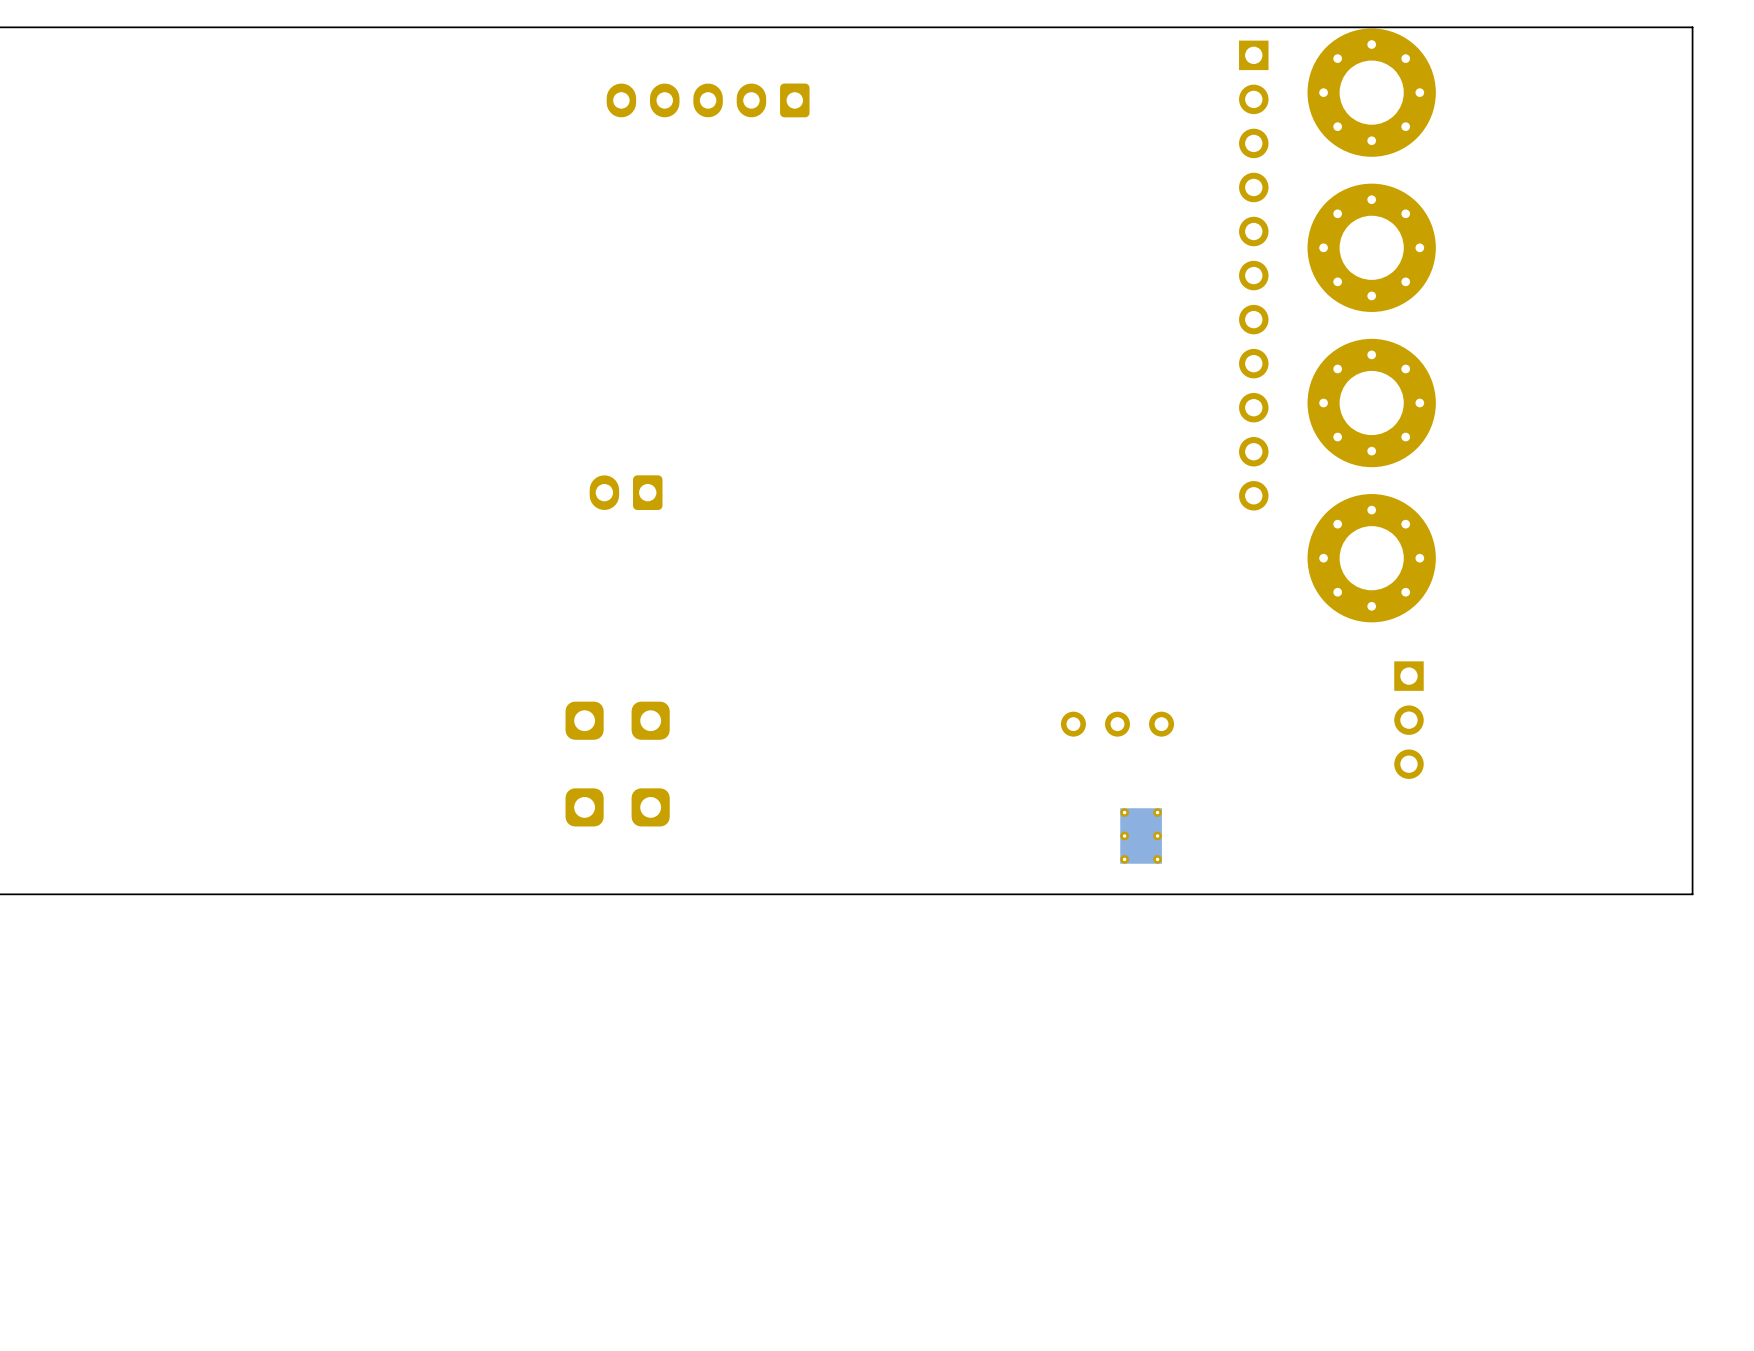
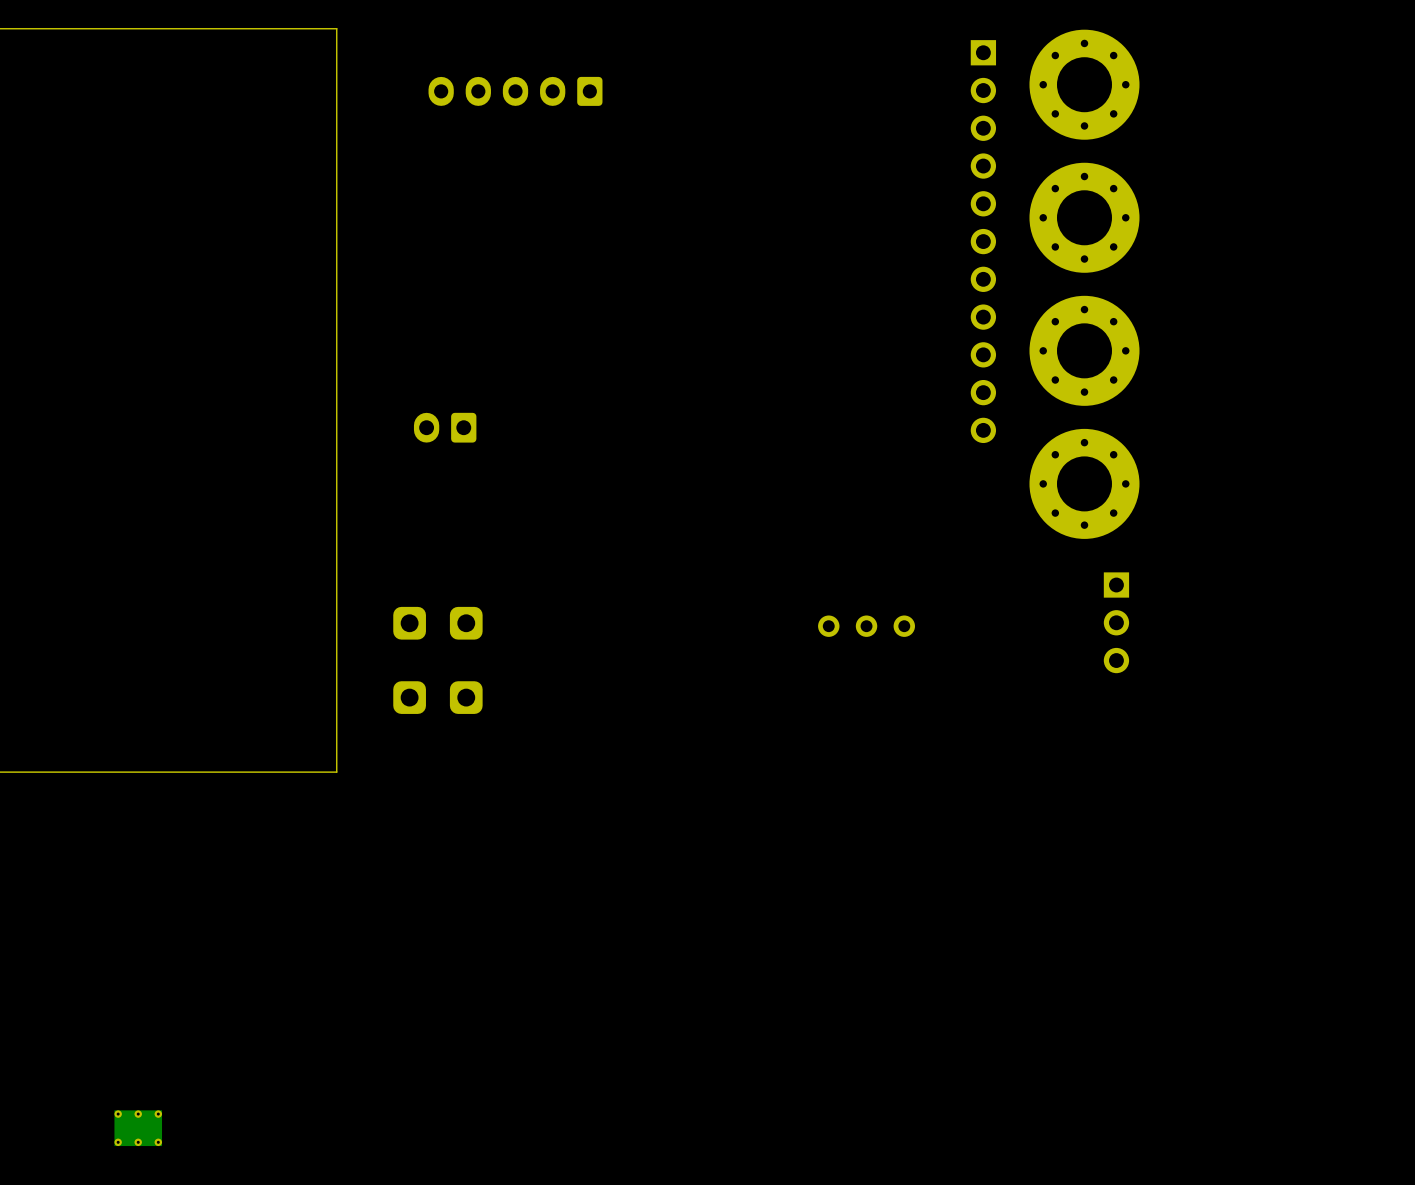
board edge: (499, 27) (1692, 27) (1692, 894) (499, 894) -> (336, 28) (336, 772)
part: (1141, 835) -> none
part: none -> (138, 1128)

